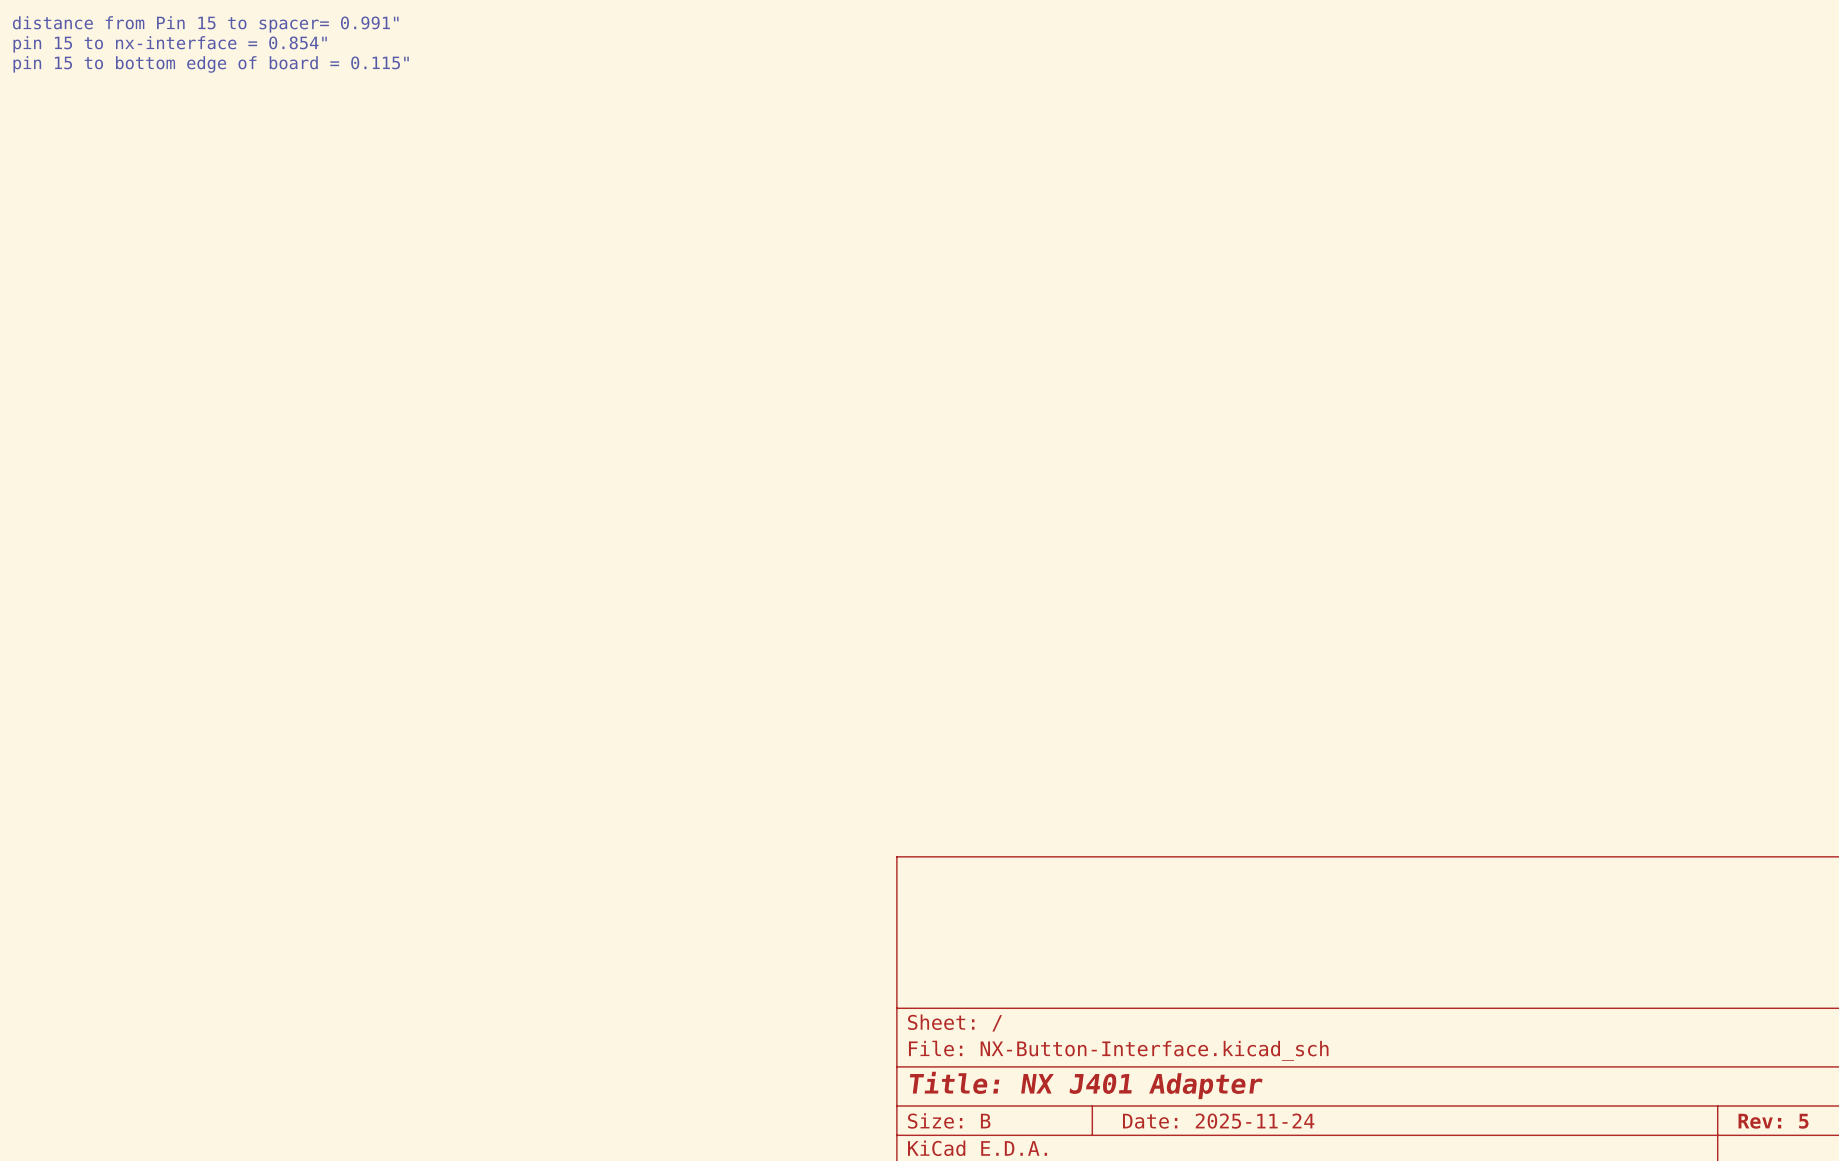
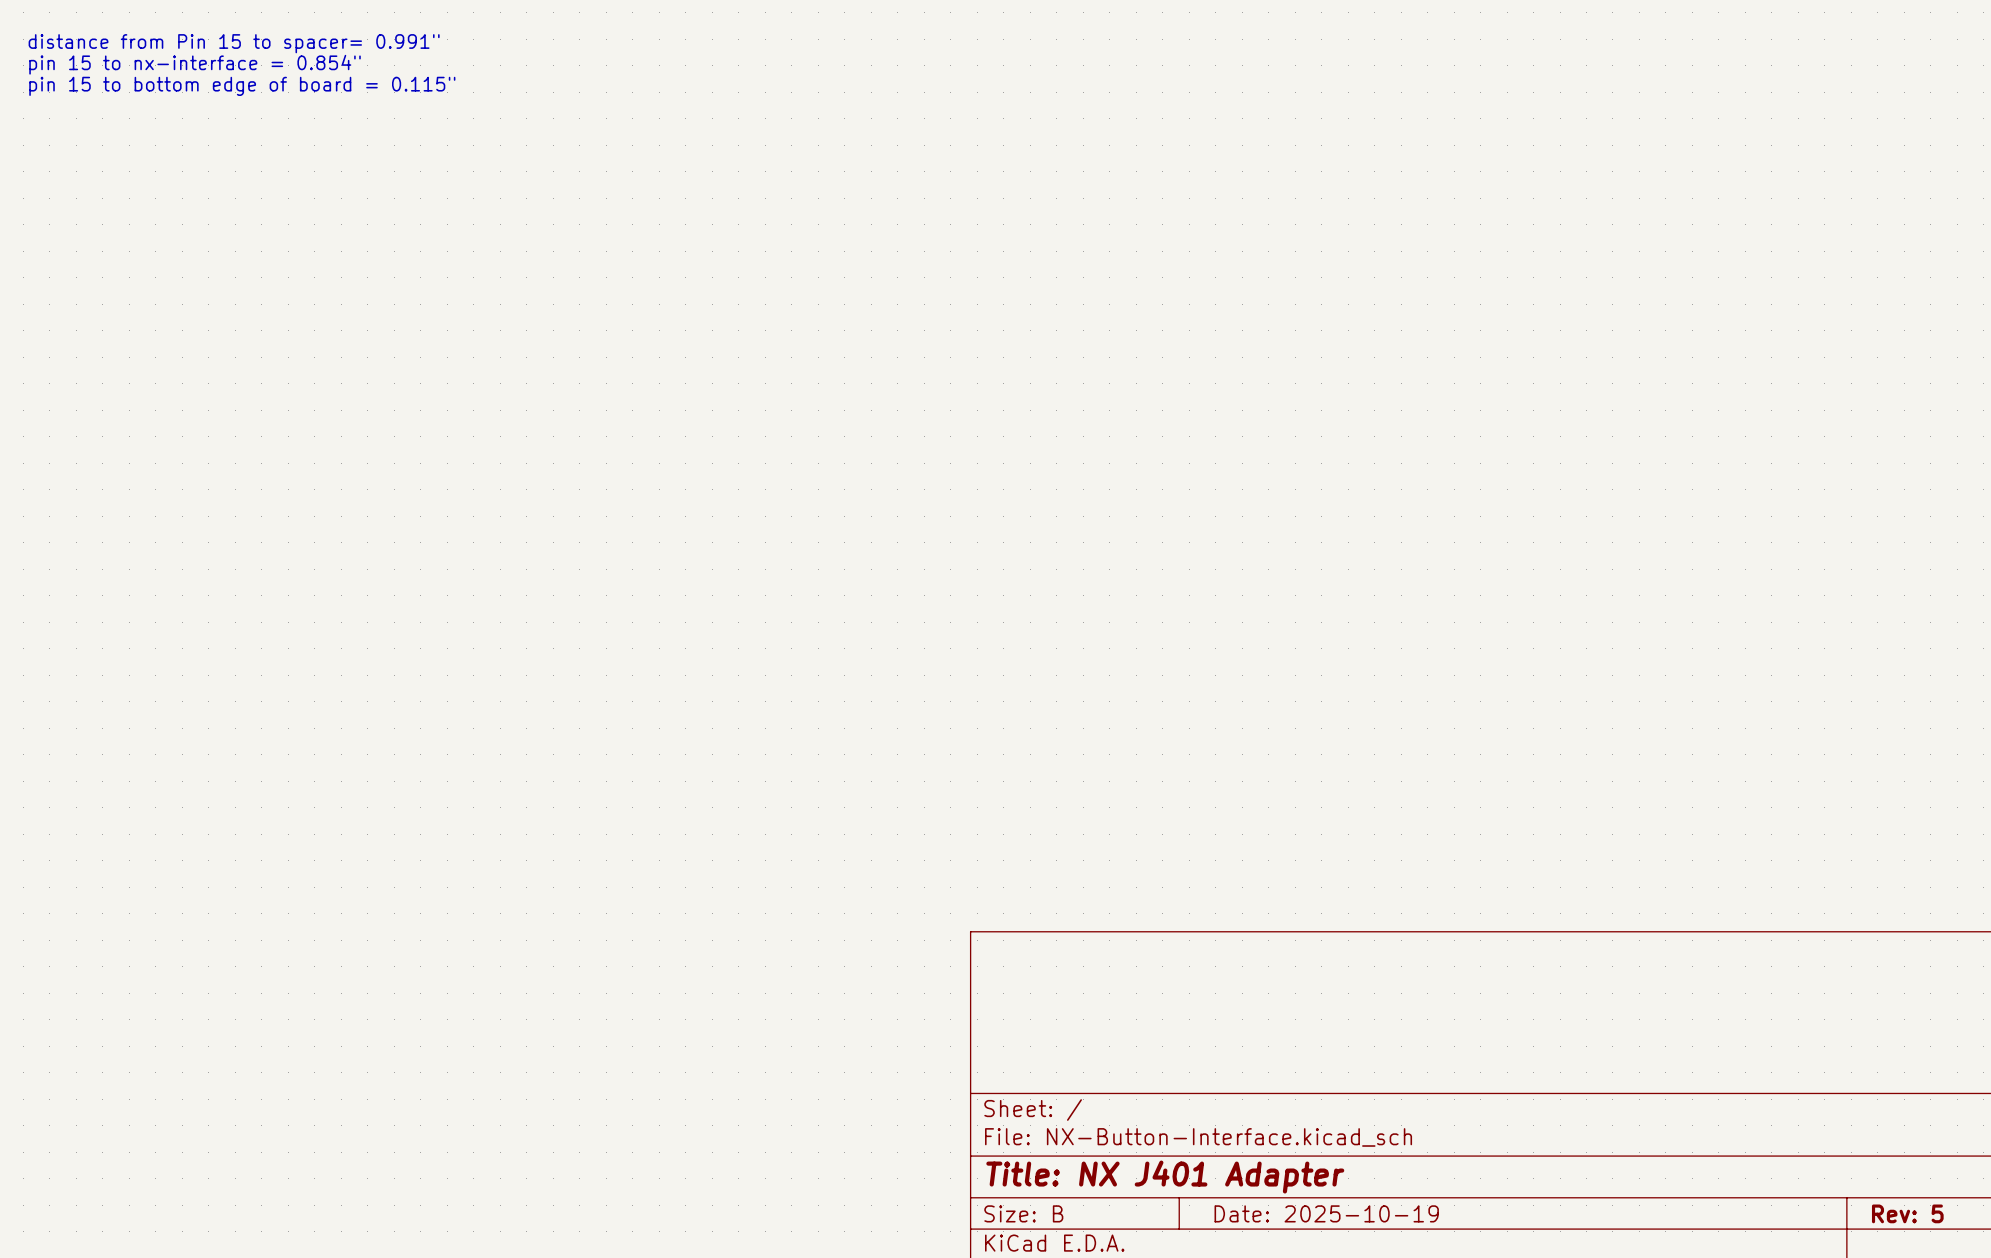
title block: Date: 2025-11-24 (1218, 1121) -> Date: 2025-10-19 (1326, 1213)

